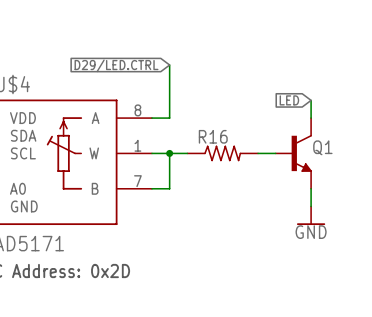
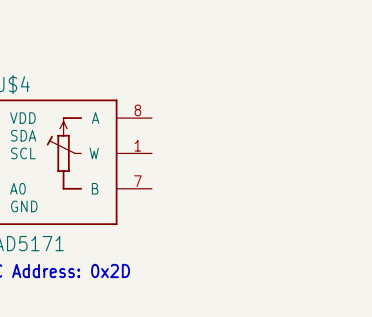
global label: D29/LED.CTRL (116, 65) -> none
wire: (169, 65) (169, 118) (151, 118) -> none
global label: LED (289, 100) -> none
wire: (311, 100) (311, 118) -> none
wire: (151, 153) (187, 153) -> none
wire: (169, 153) (169, 188) (151, 188) -> none
junction: (169, 153) -> none
R16: (222, 153) -> none
wire: (258, 153) (275, 153) -> none
Q1: (293, 153) -> none
wire: (311, 188) (311, 206) -> none
power symbol: GND (311, 215) -> none

